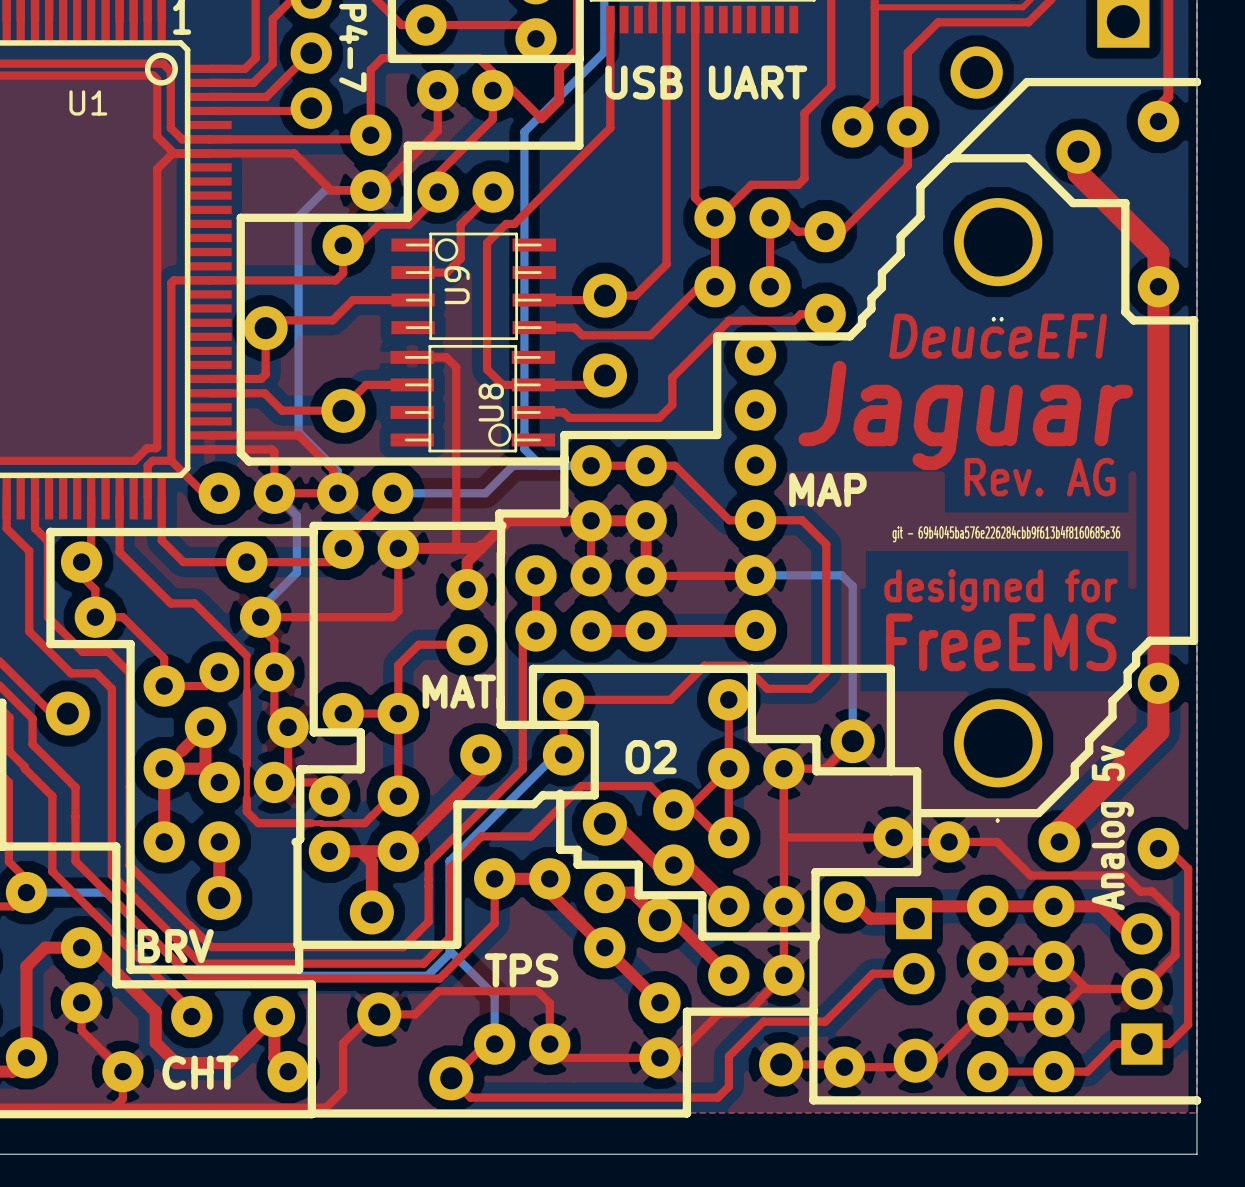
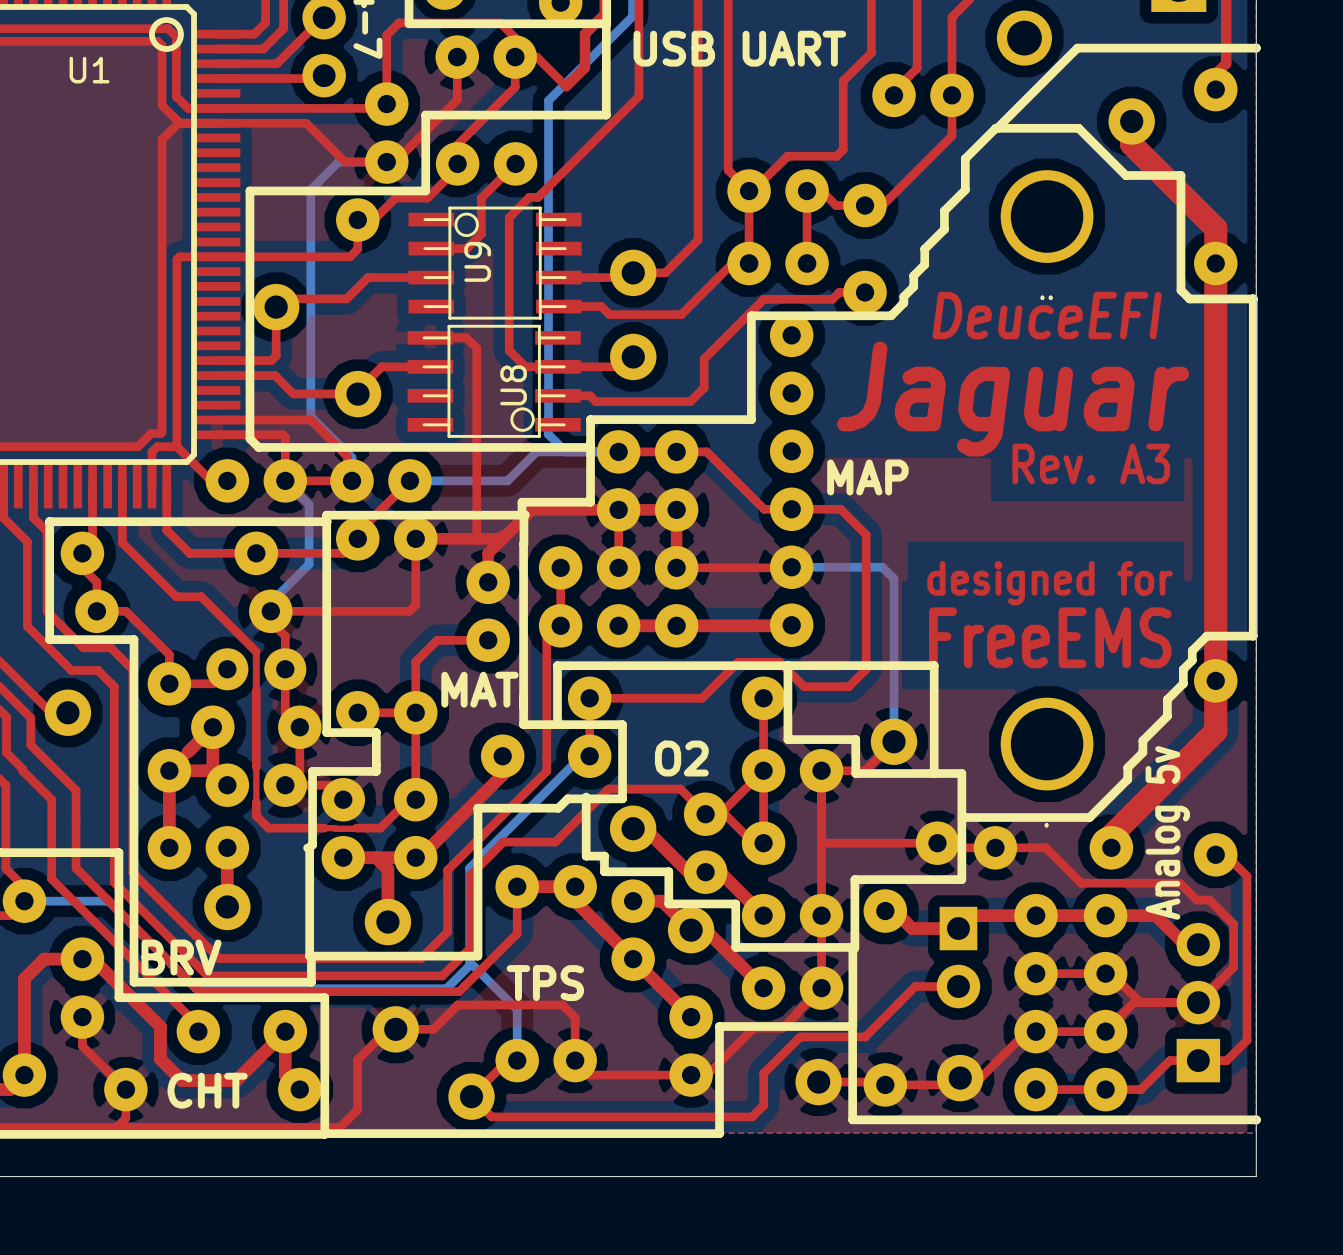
text: Rev. AG (1040, 477) -> Rev. A3 (1091, 463)
text: git - 69b4045ba576e226284cbb9f613b4f8160685e36 (1006, 534) -> none

